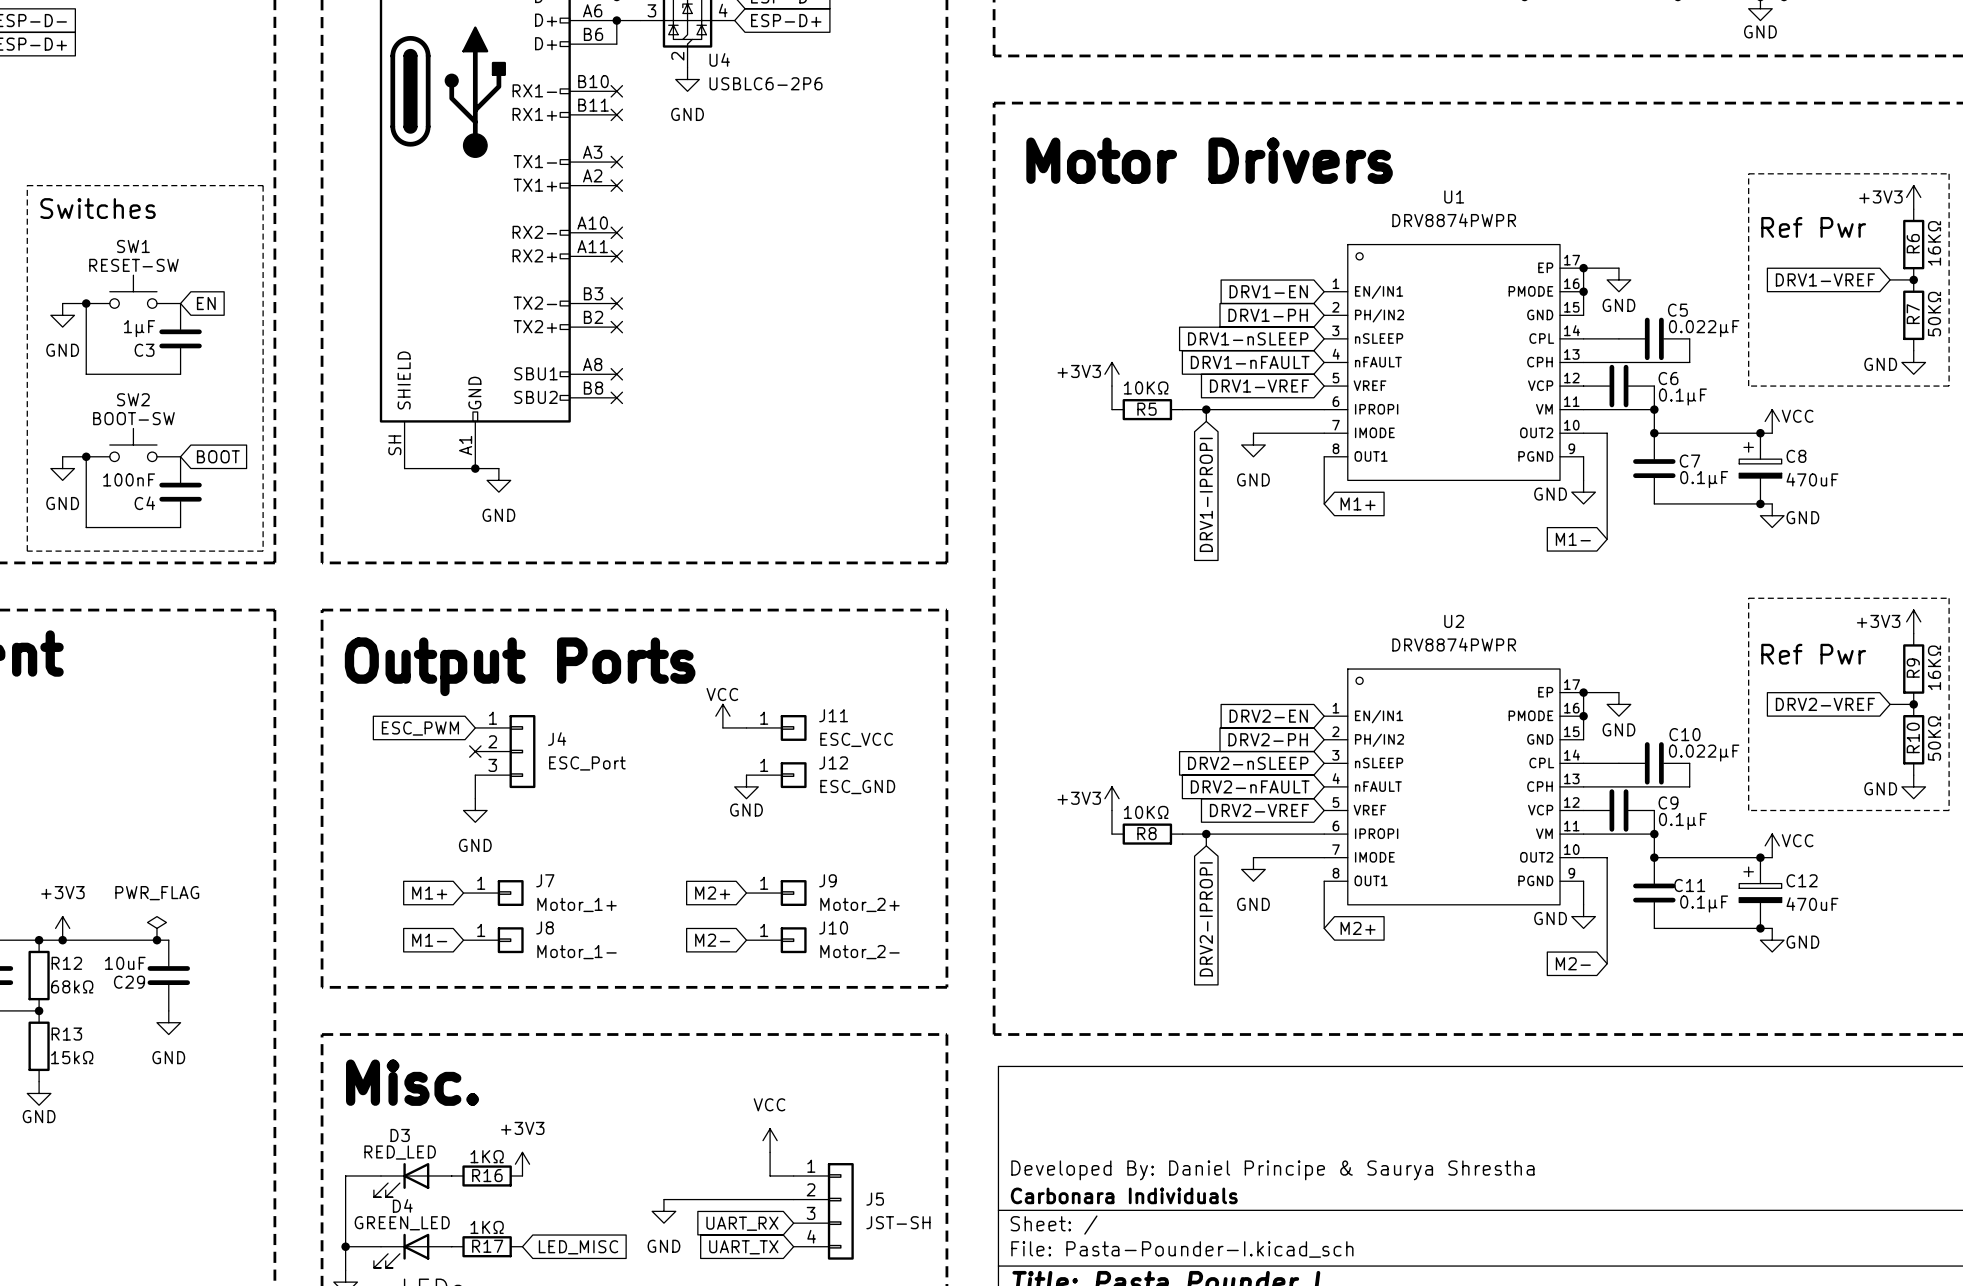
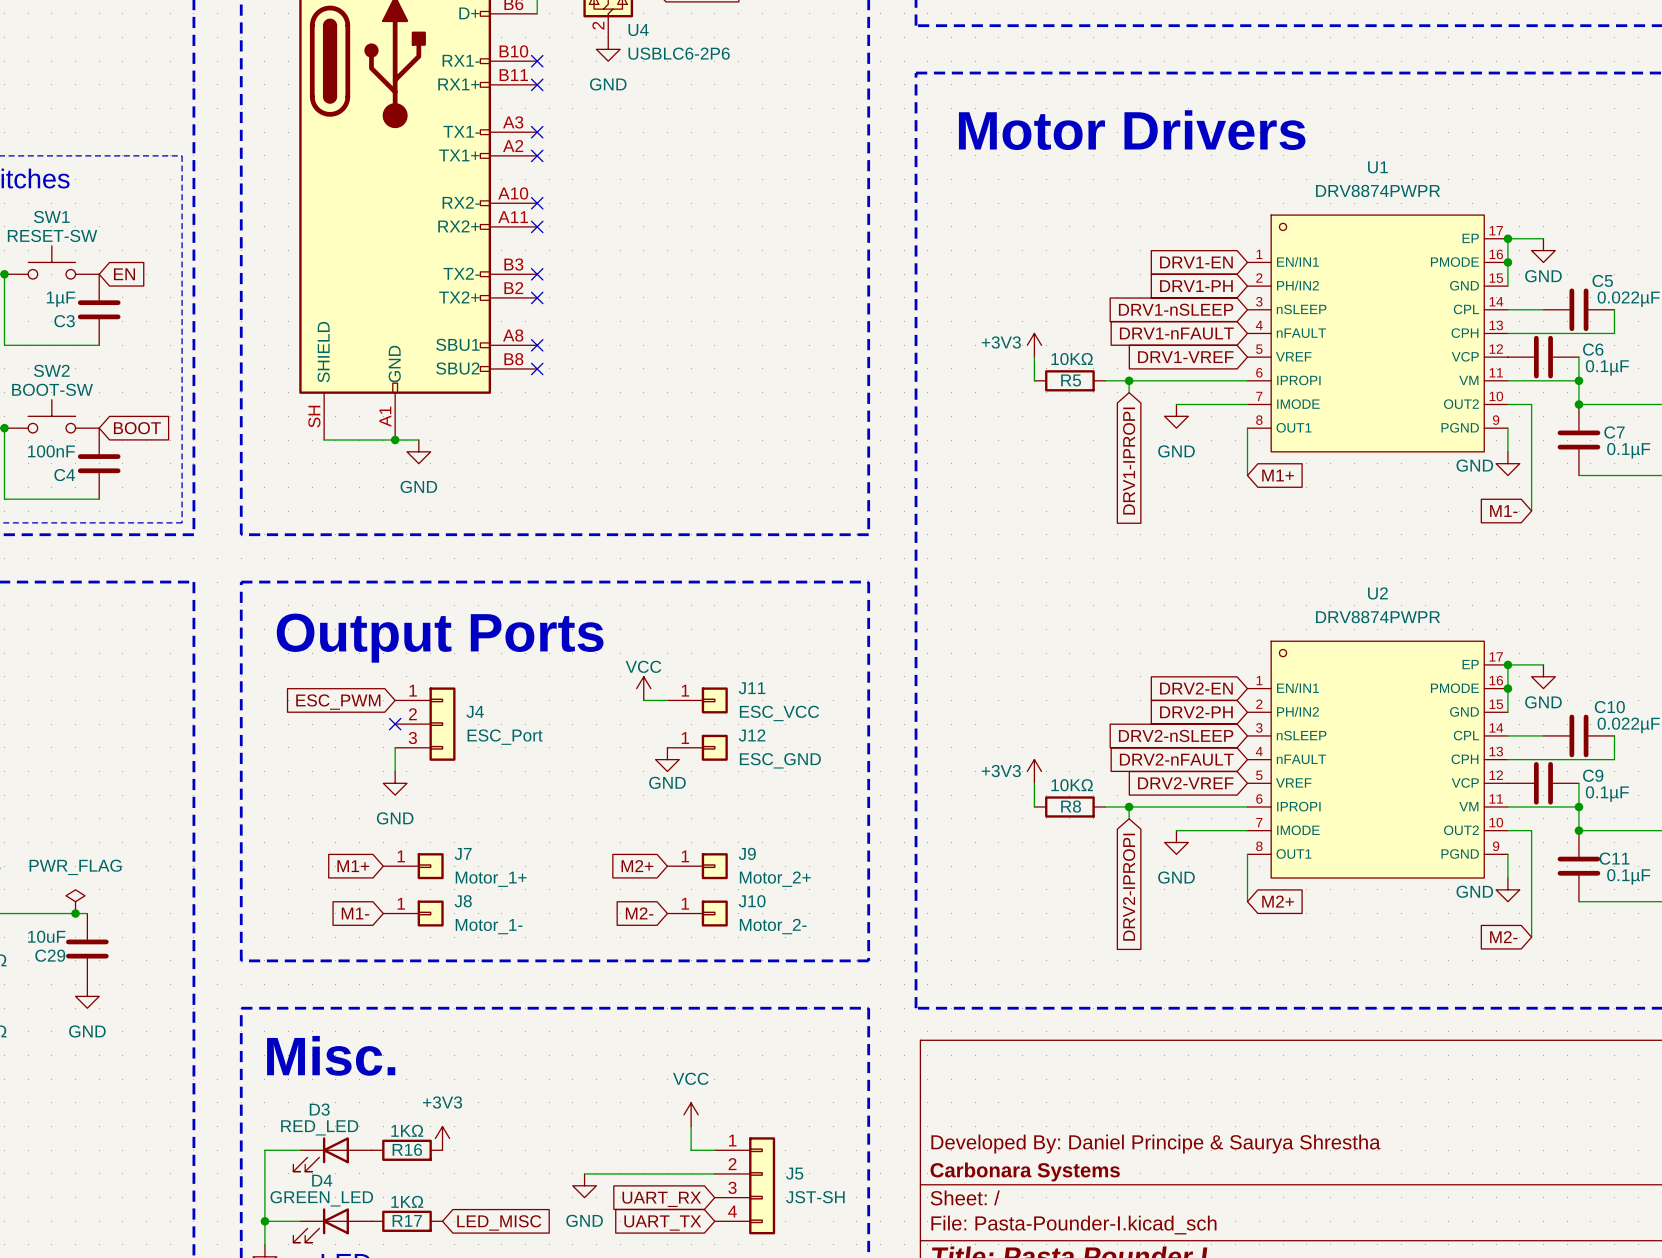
title block: Carbonara Individuals (1124, 1195) -> Carbonara Systems (1025, 1172)

